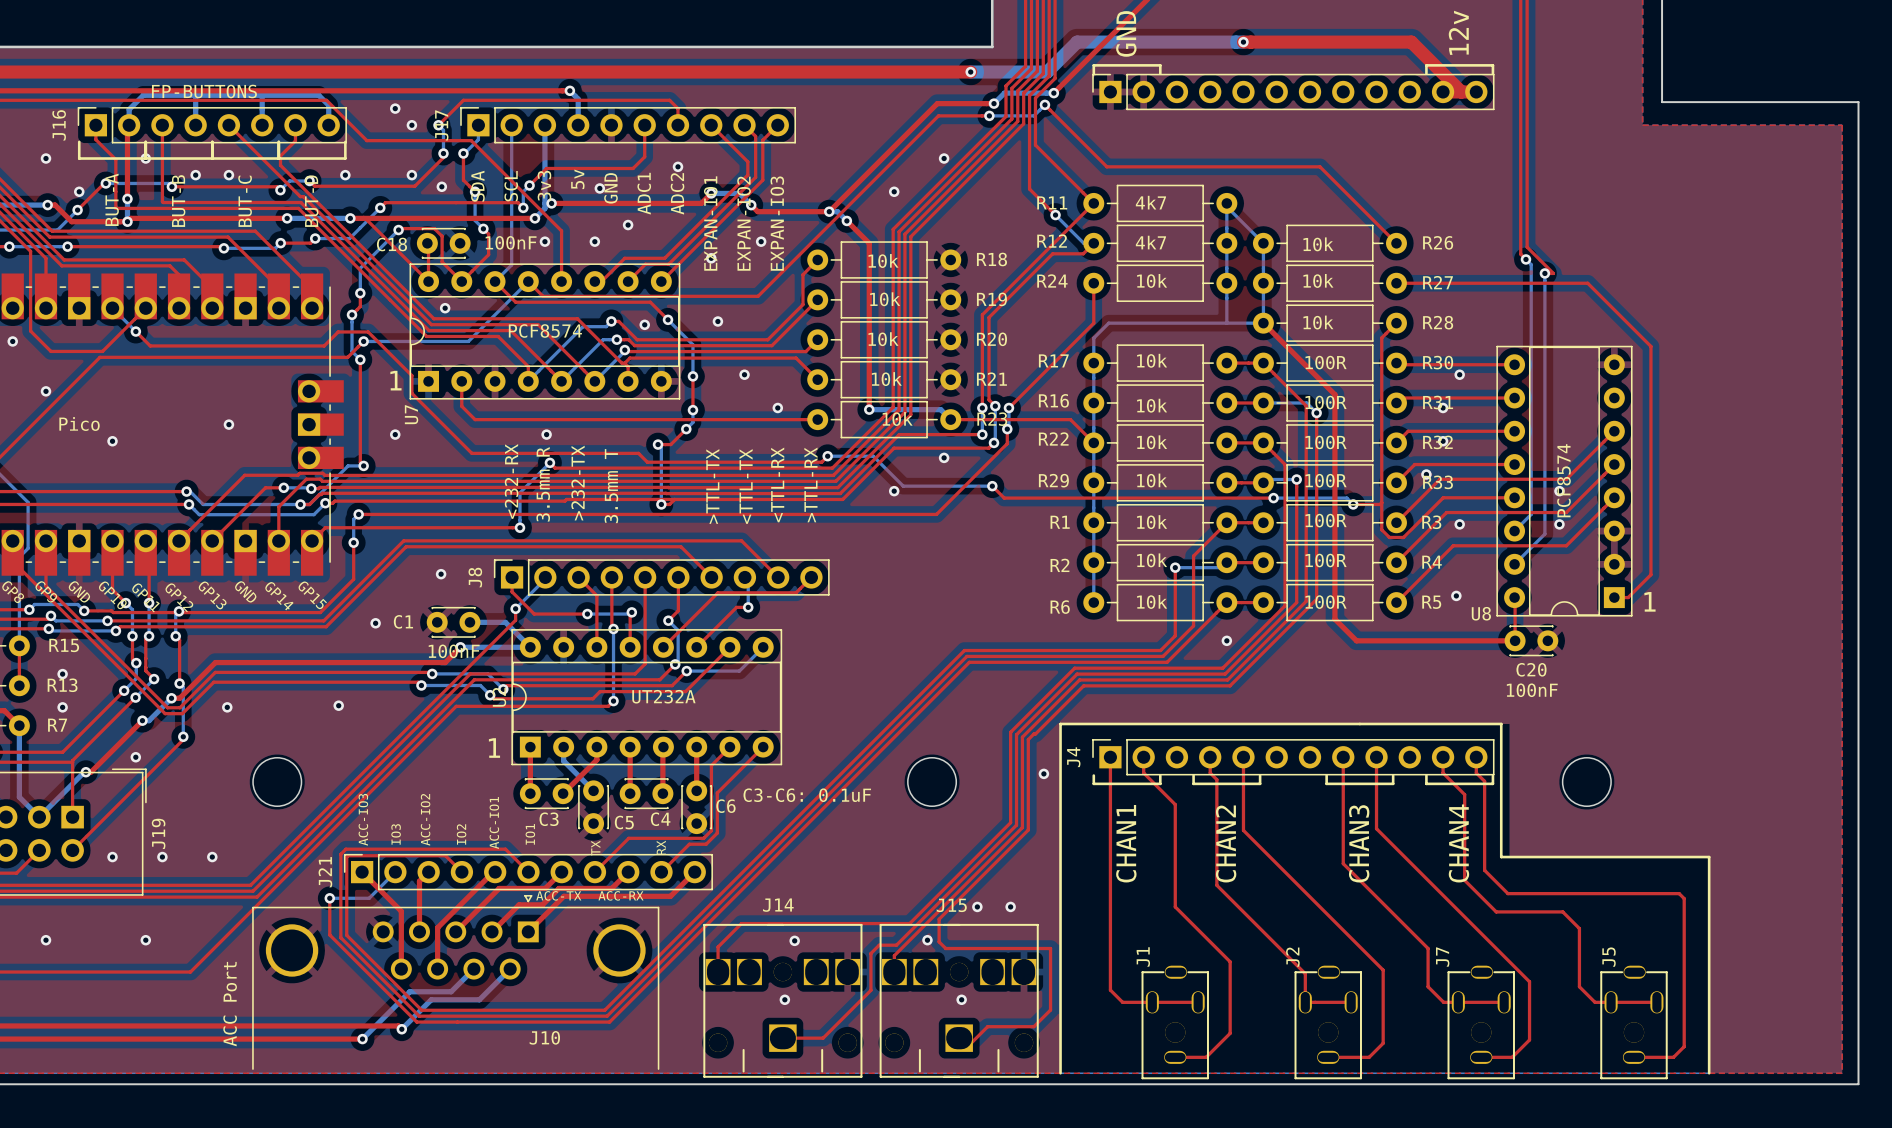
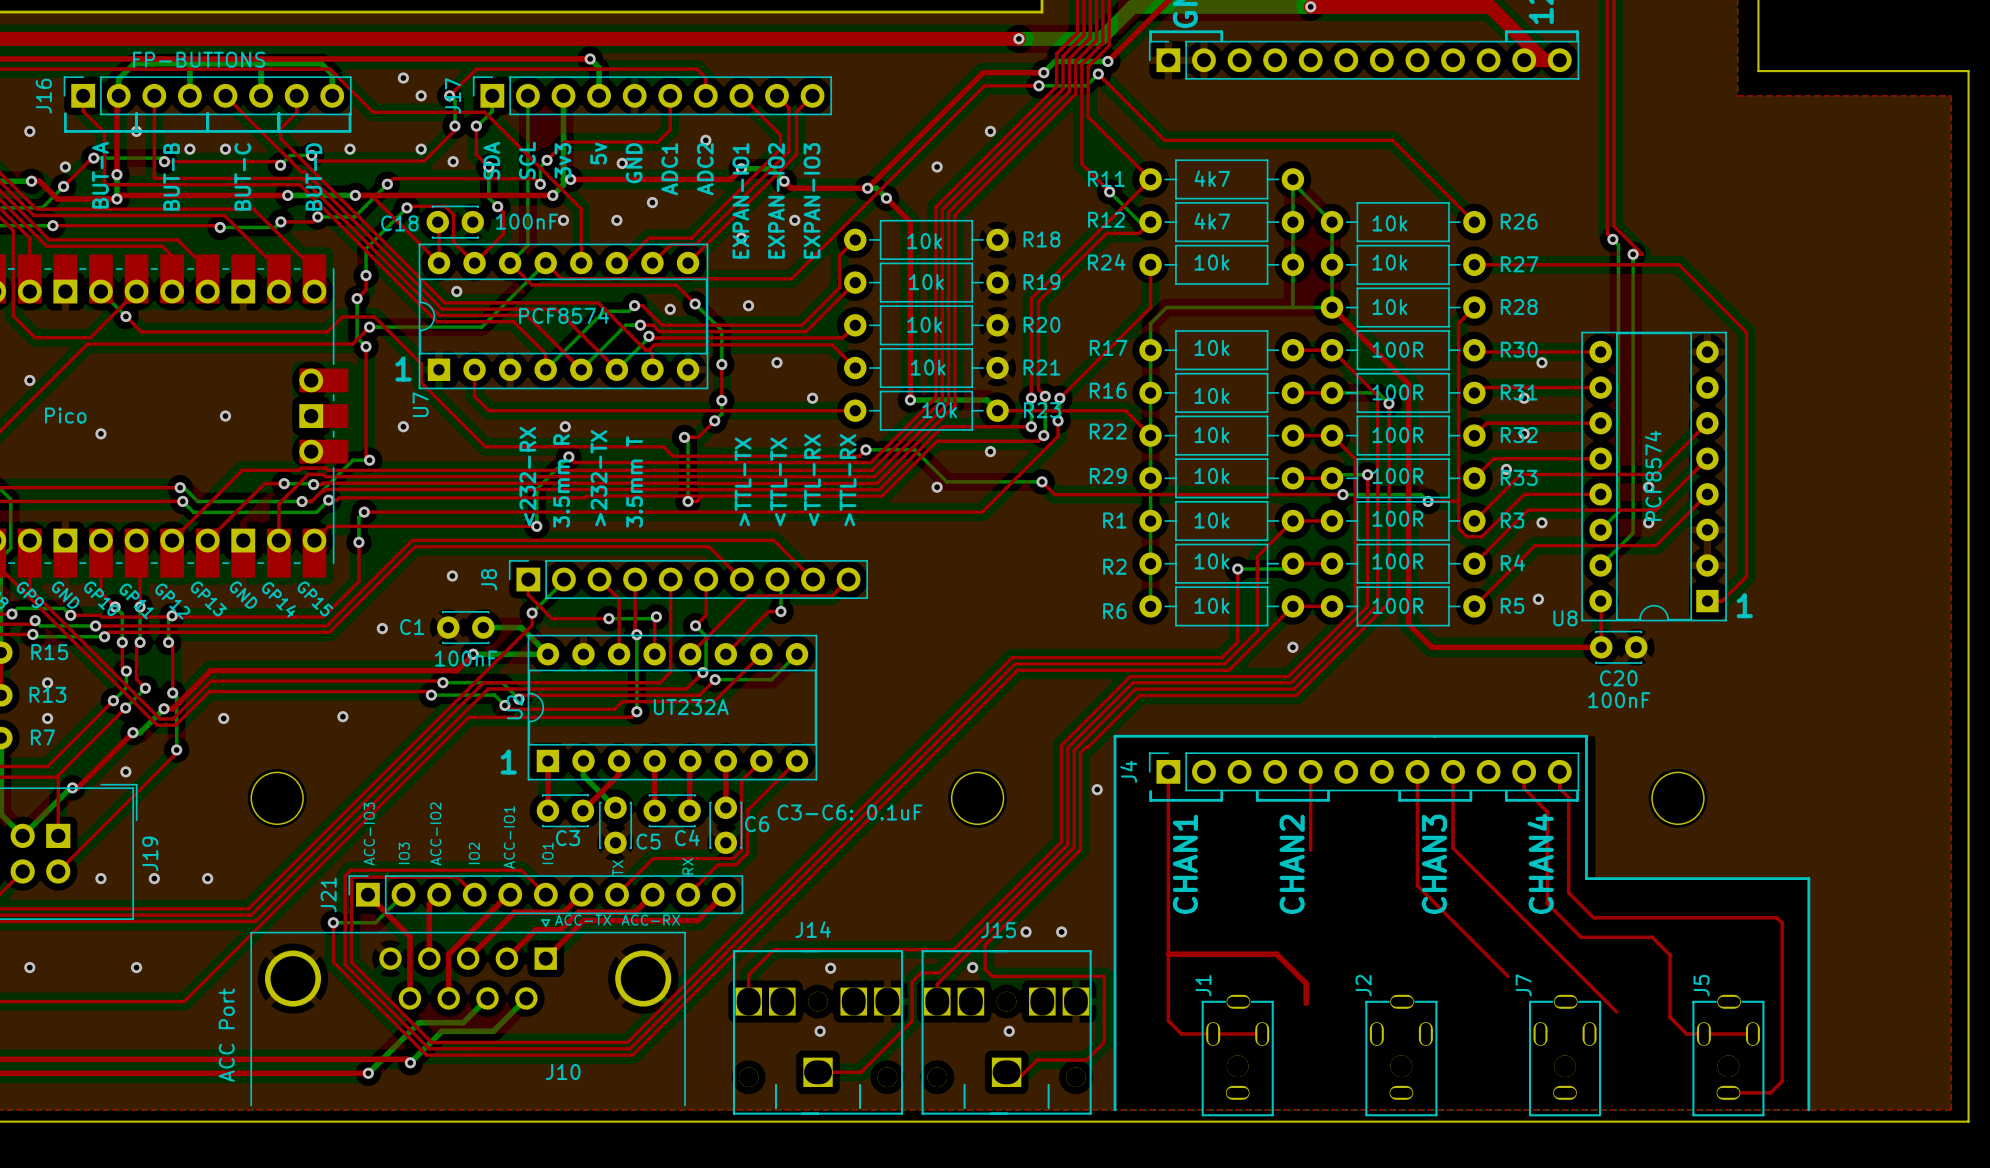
top track: (1143, 757) (1143, 772) (1175, 804) (1175, 906) (1230, 961) (1230, 1033) (1206, 1057) (1175, 1057) -> none
top track: (1210, 757) (1210, 772) (1216, 779) (1216, 885) (1305, 973) (1305, 1002) (1351, 1002) -> none
top track: (1243, 830) (1383, 970) (1383, 1043) (1369, 1057) (1328, 1057) -> none
top track: none -> (1168, 954) (1276, 954) (1306, 983) (1306, 1003)
top track: (1428, 948) (1428, 986) (1443, 1002) (1504, 1002) -> none
top track: (1529, 981) (1529, 1039) (1512, 1057) (1481, 1057) -> none

